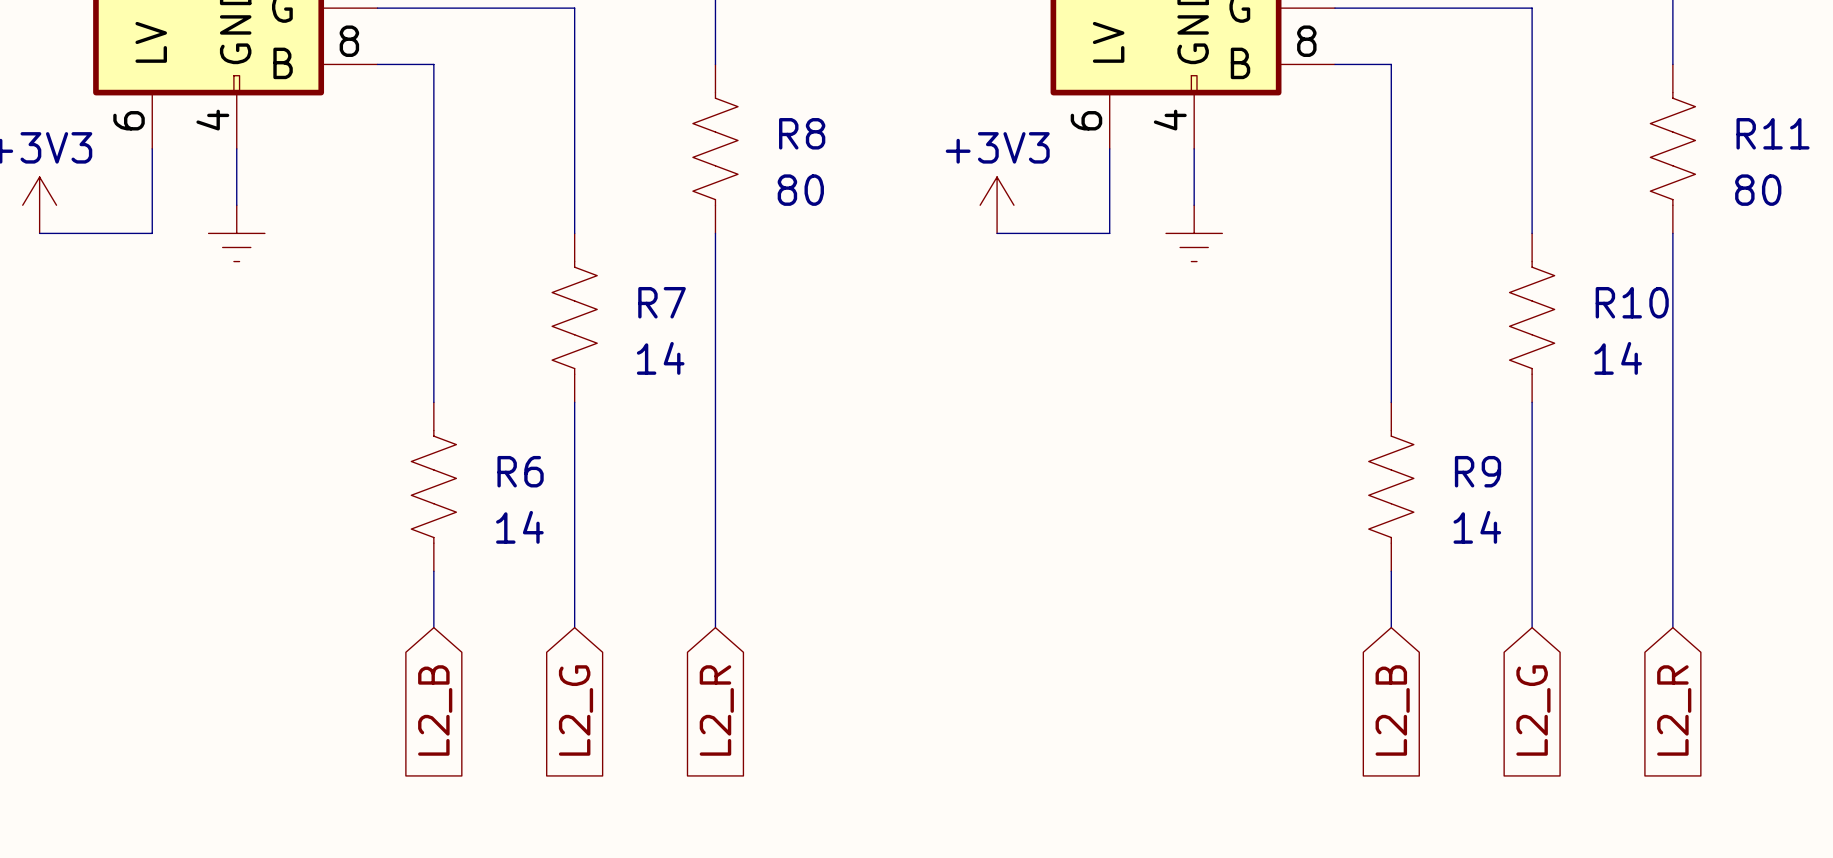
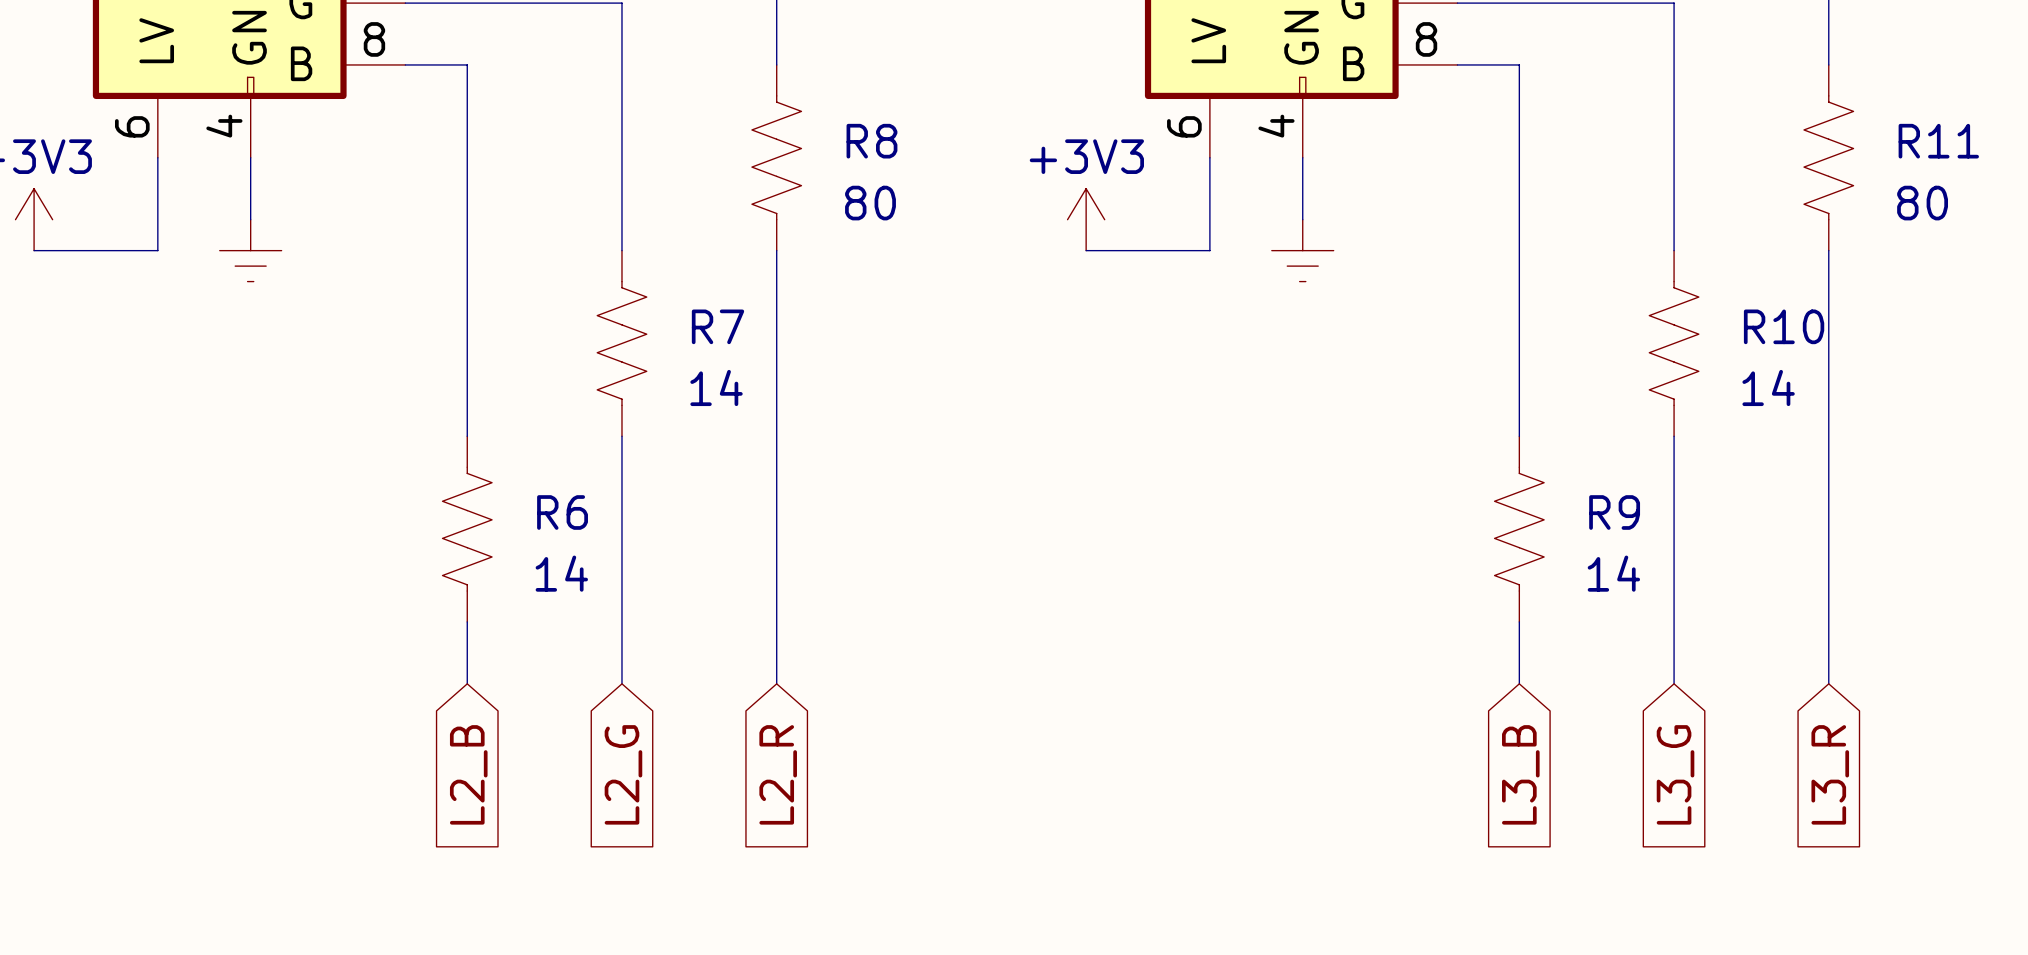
global label: L2_B (1392, 710) -> L3_B (1520, 774)
global label: L2_G (1533, 710) -> L3_G (1675, 774)
global label: L2_R (1674, 710) -> L3_R (1830, 774)

